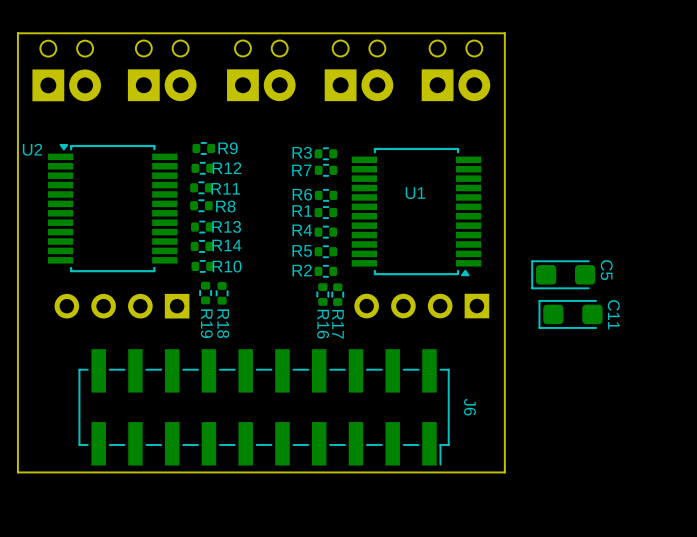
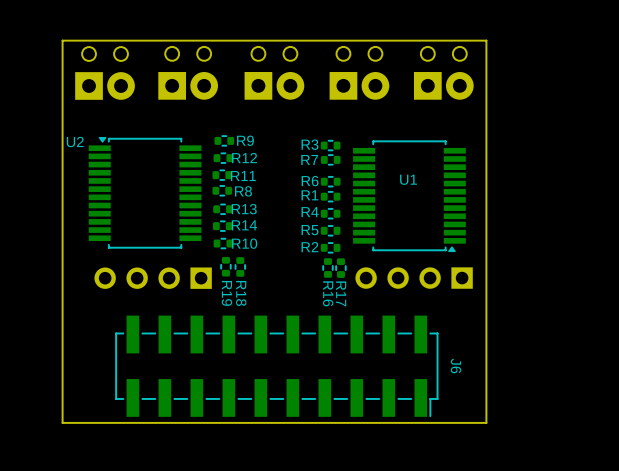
C5: (563, 274) -> none
C11: (570, 314) -> none

